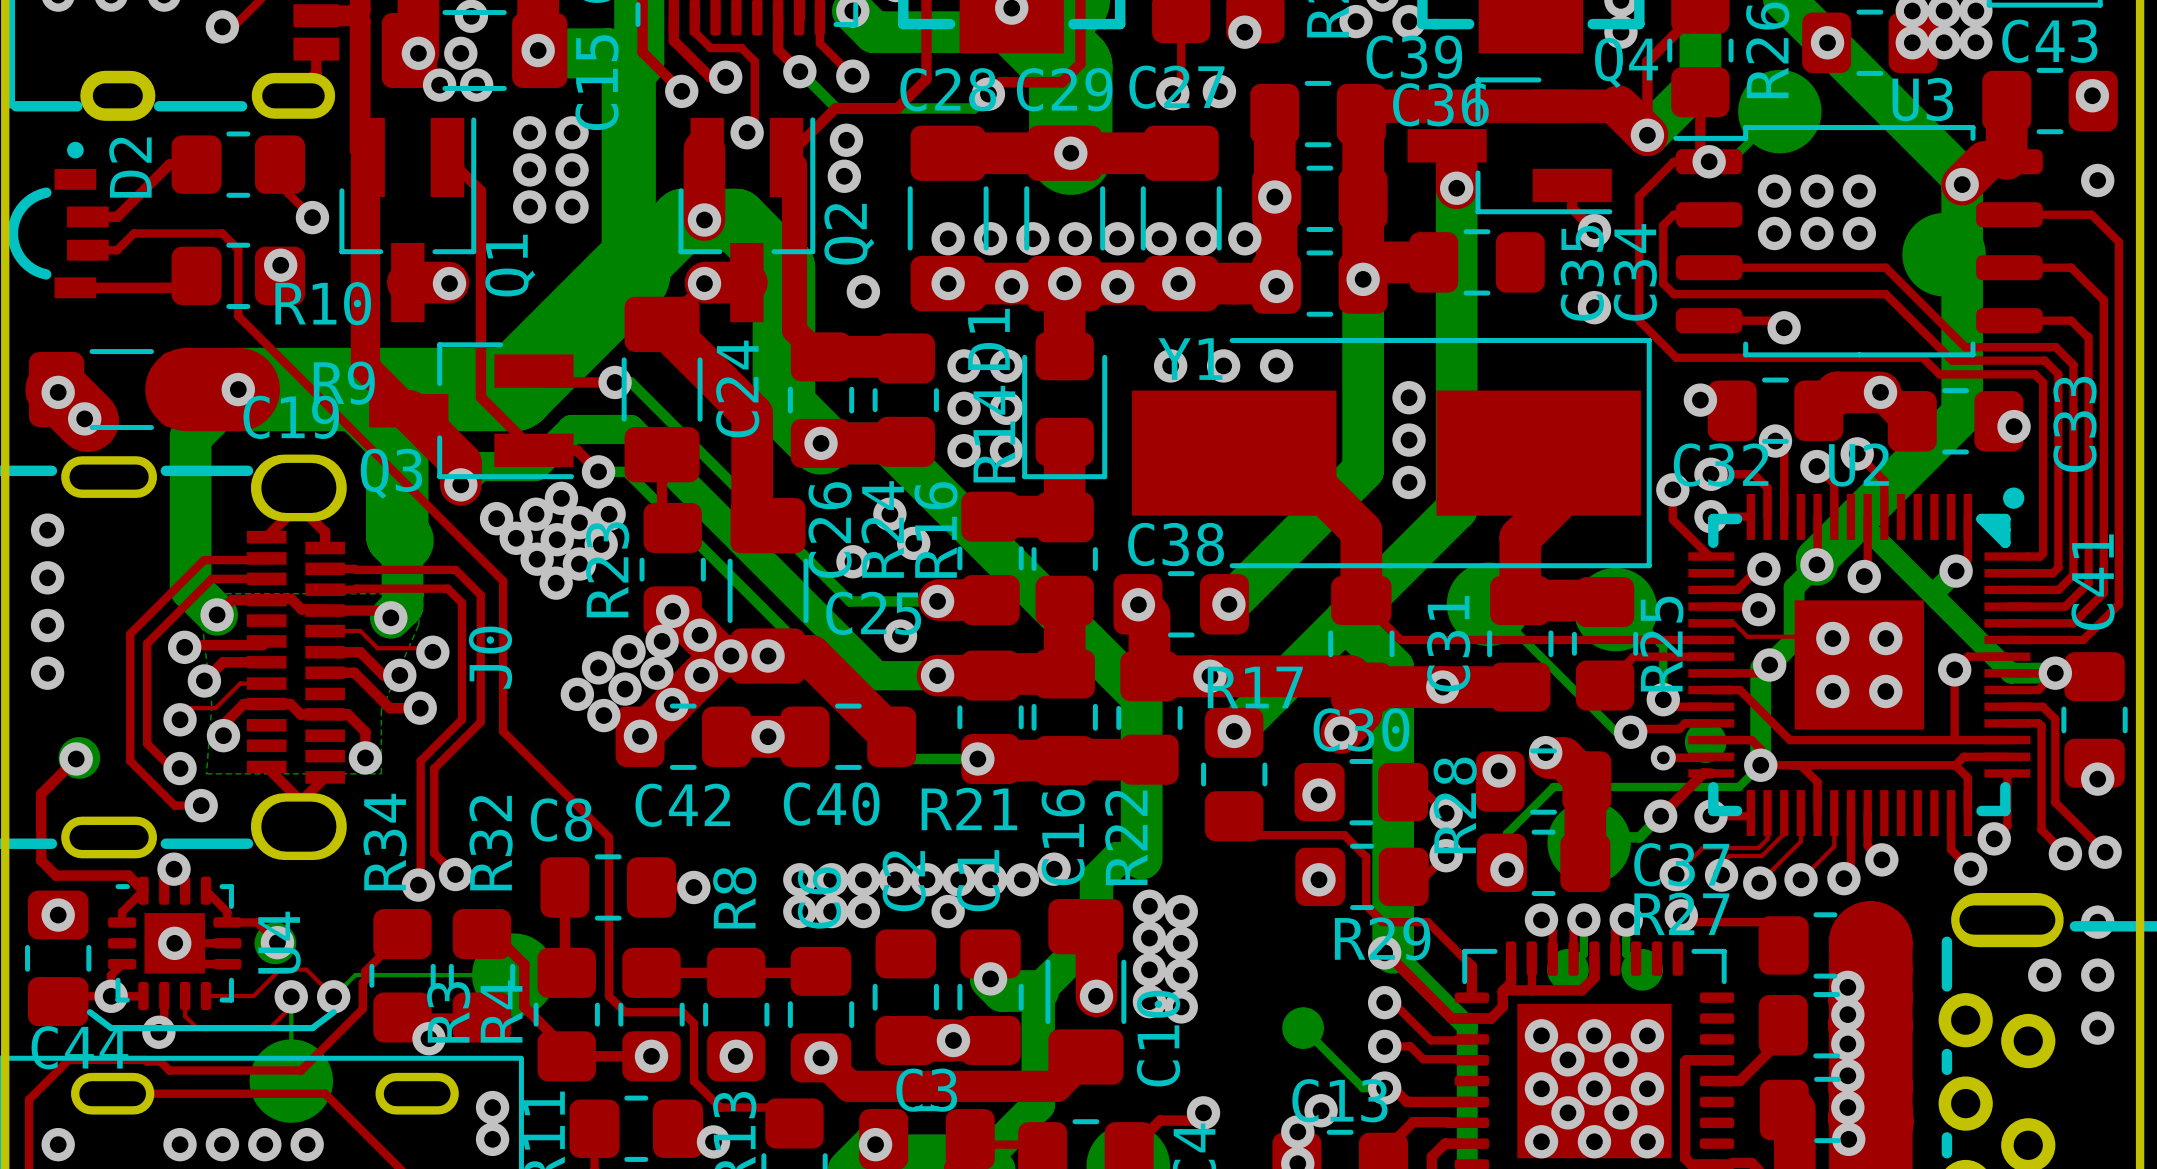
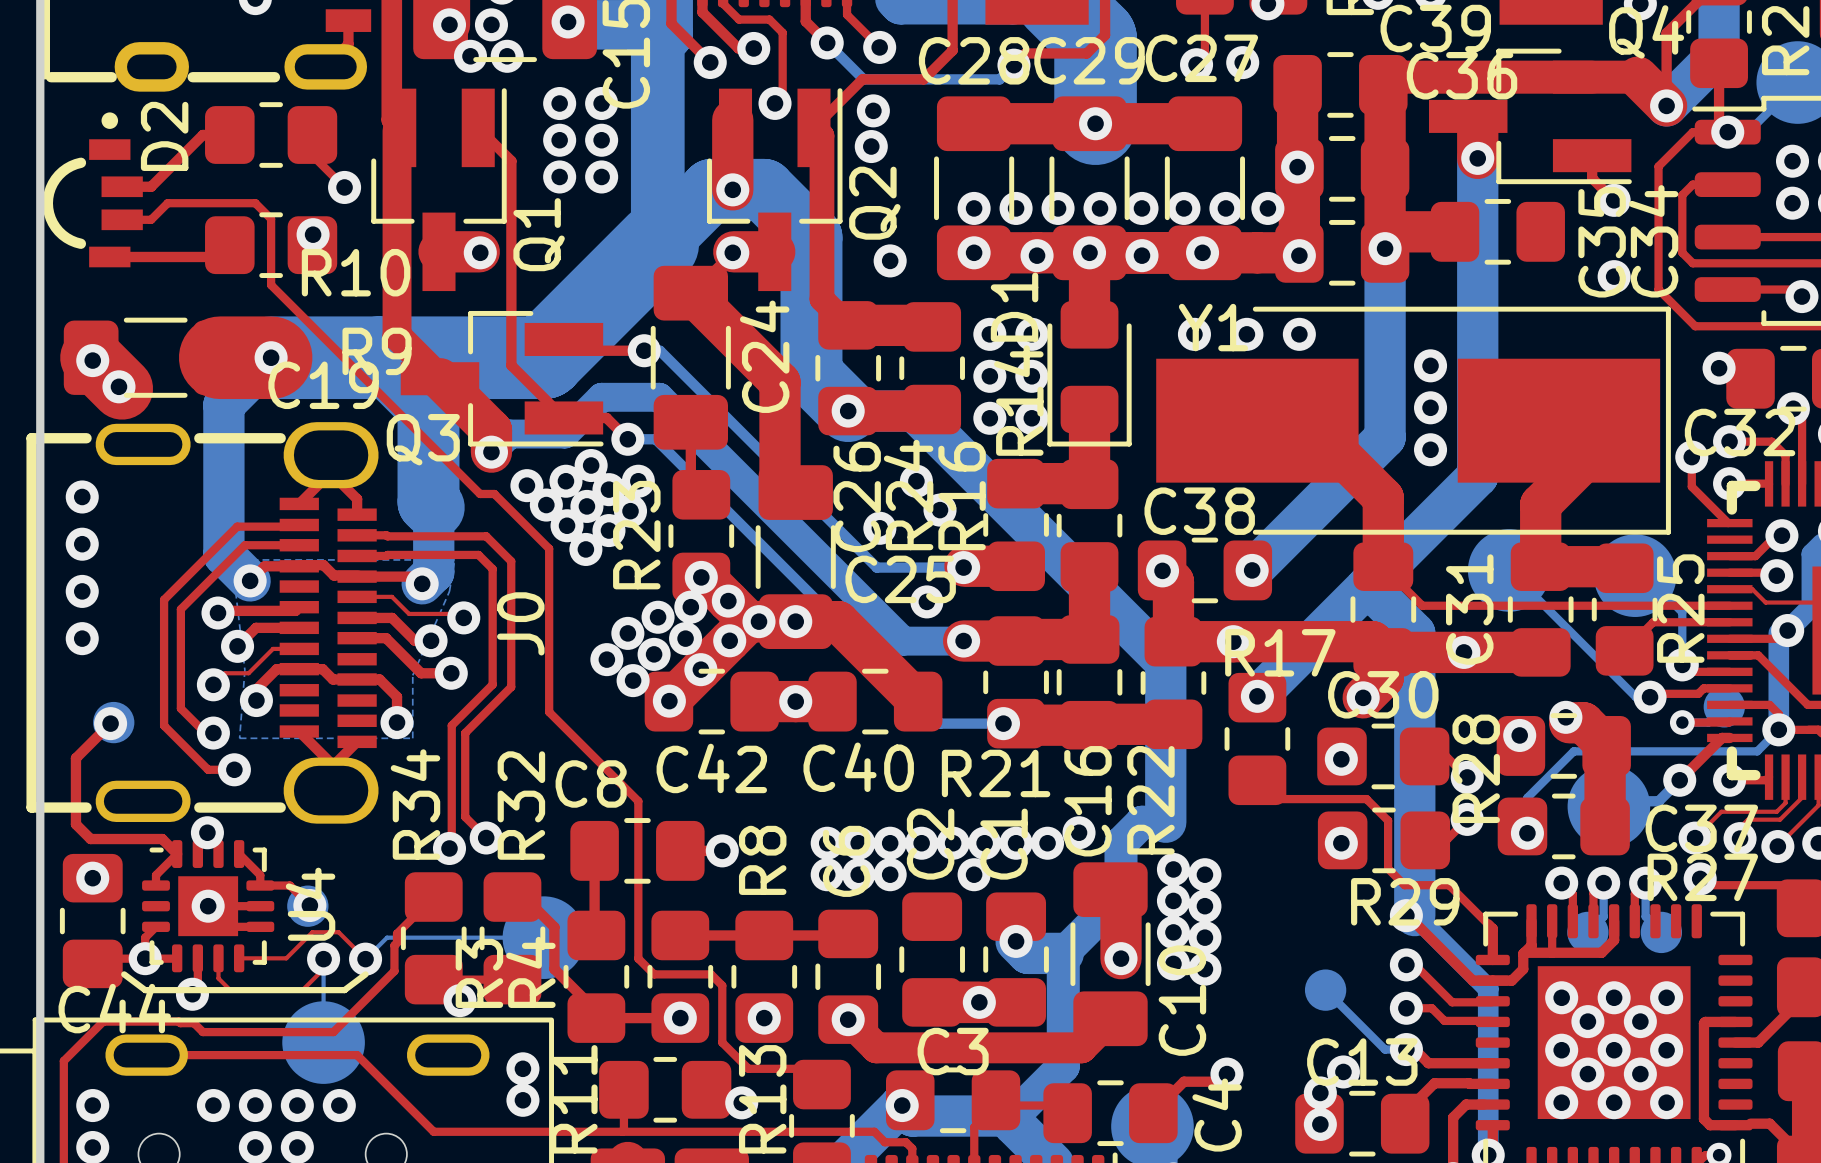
top track: (449, 527) (503, 580) (503, 731) (519, 747) -> (480, 493) (494, 493) (549, 548) (549, 712)

